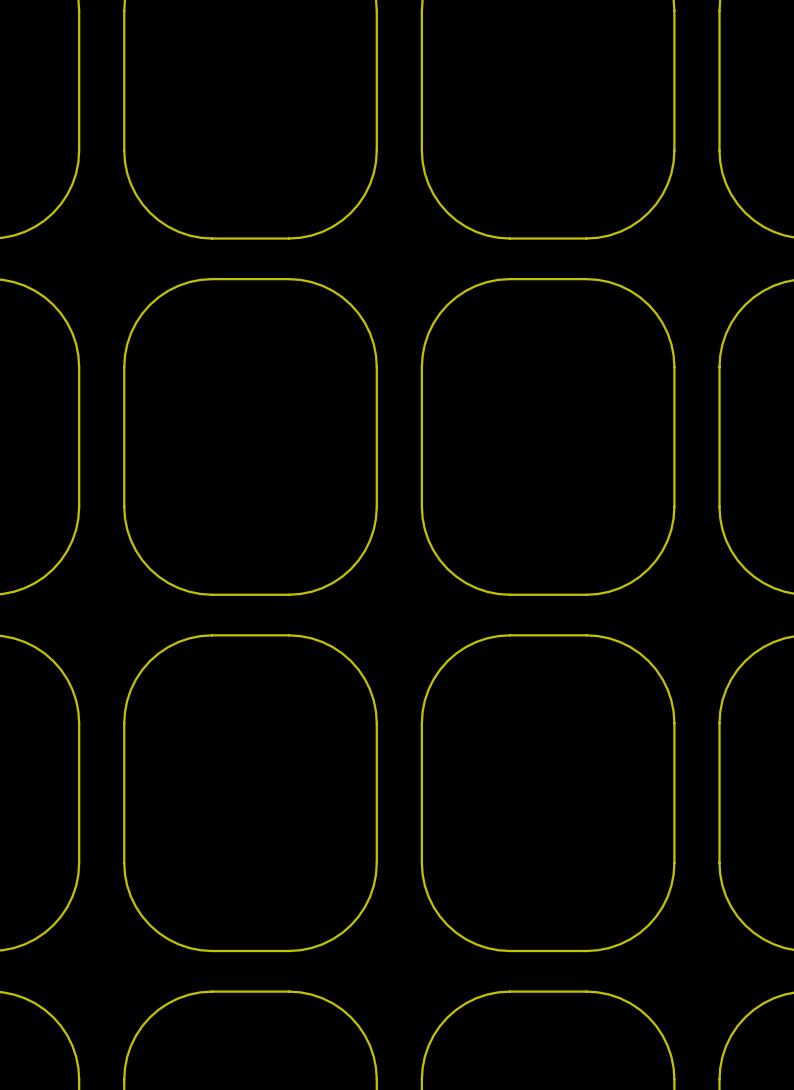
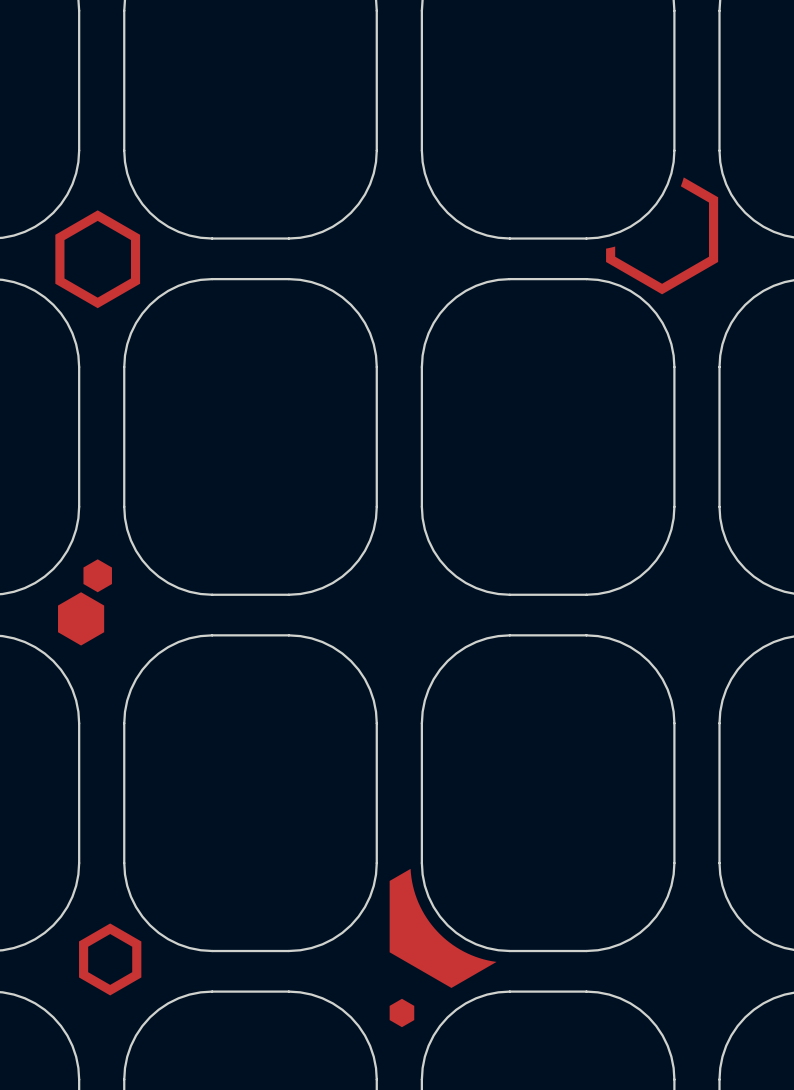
drawing: none -> [606, 177, 719, 295]
drawing: none -> [55, 210, 141, 309]
drawing: none -> [58, 559, 112, 646]
drawing: none -> [389, 868, 497, 1028]
drawing: none -> [79, 923, 142, 996]

